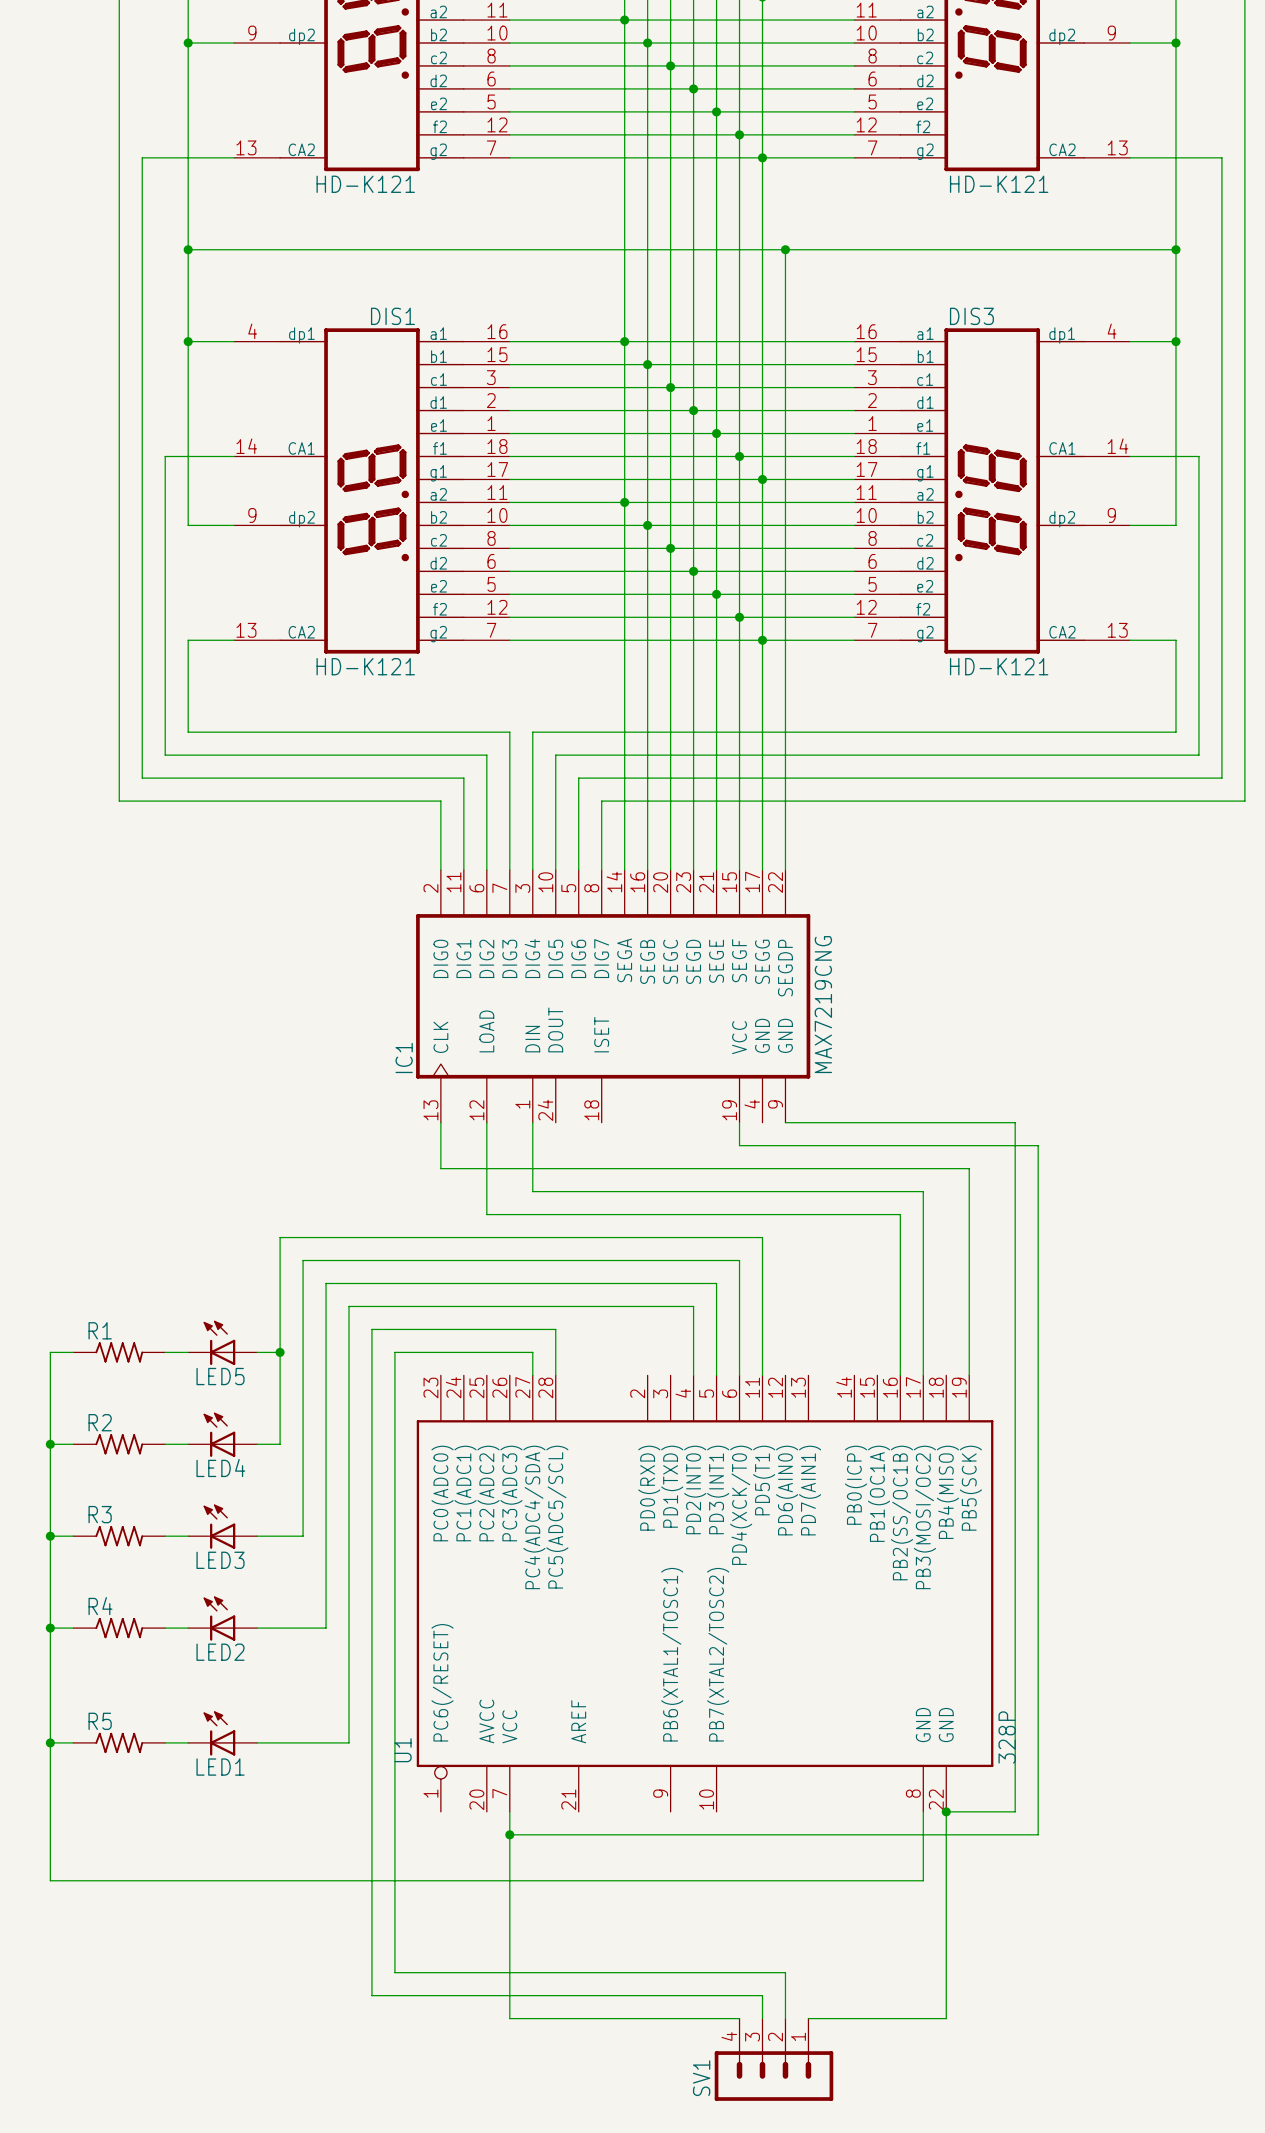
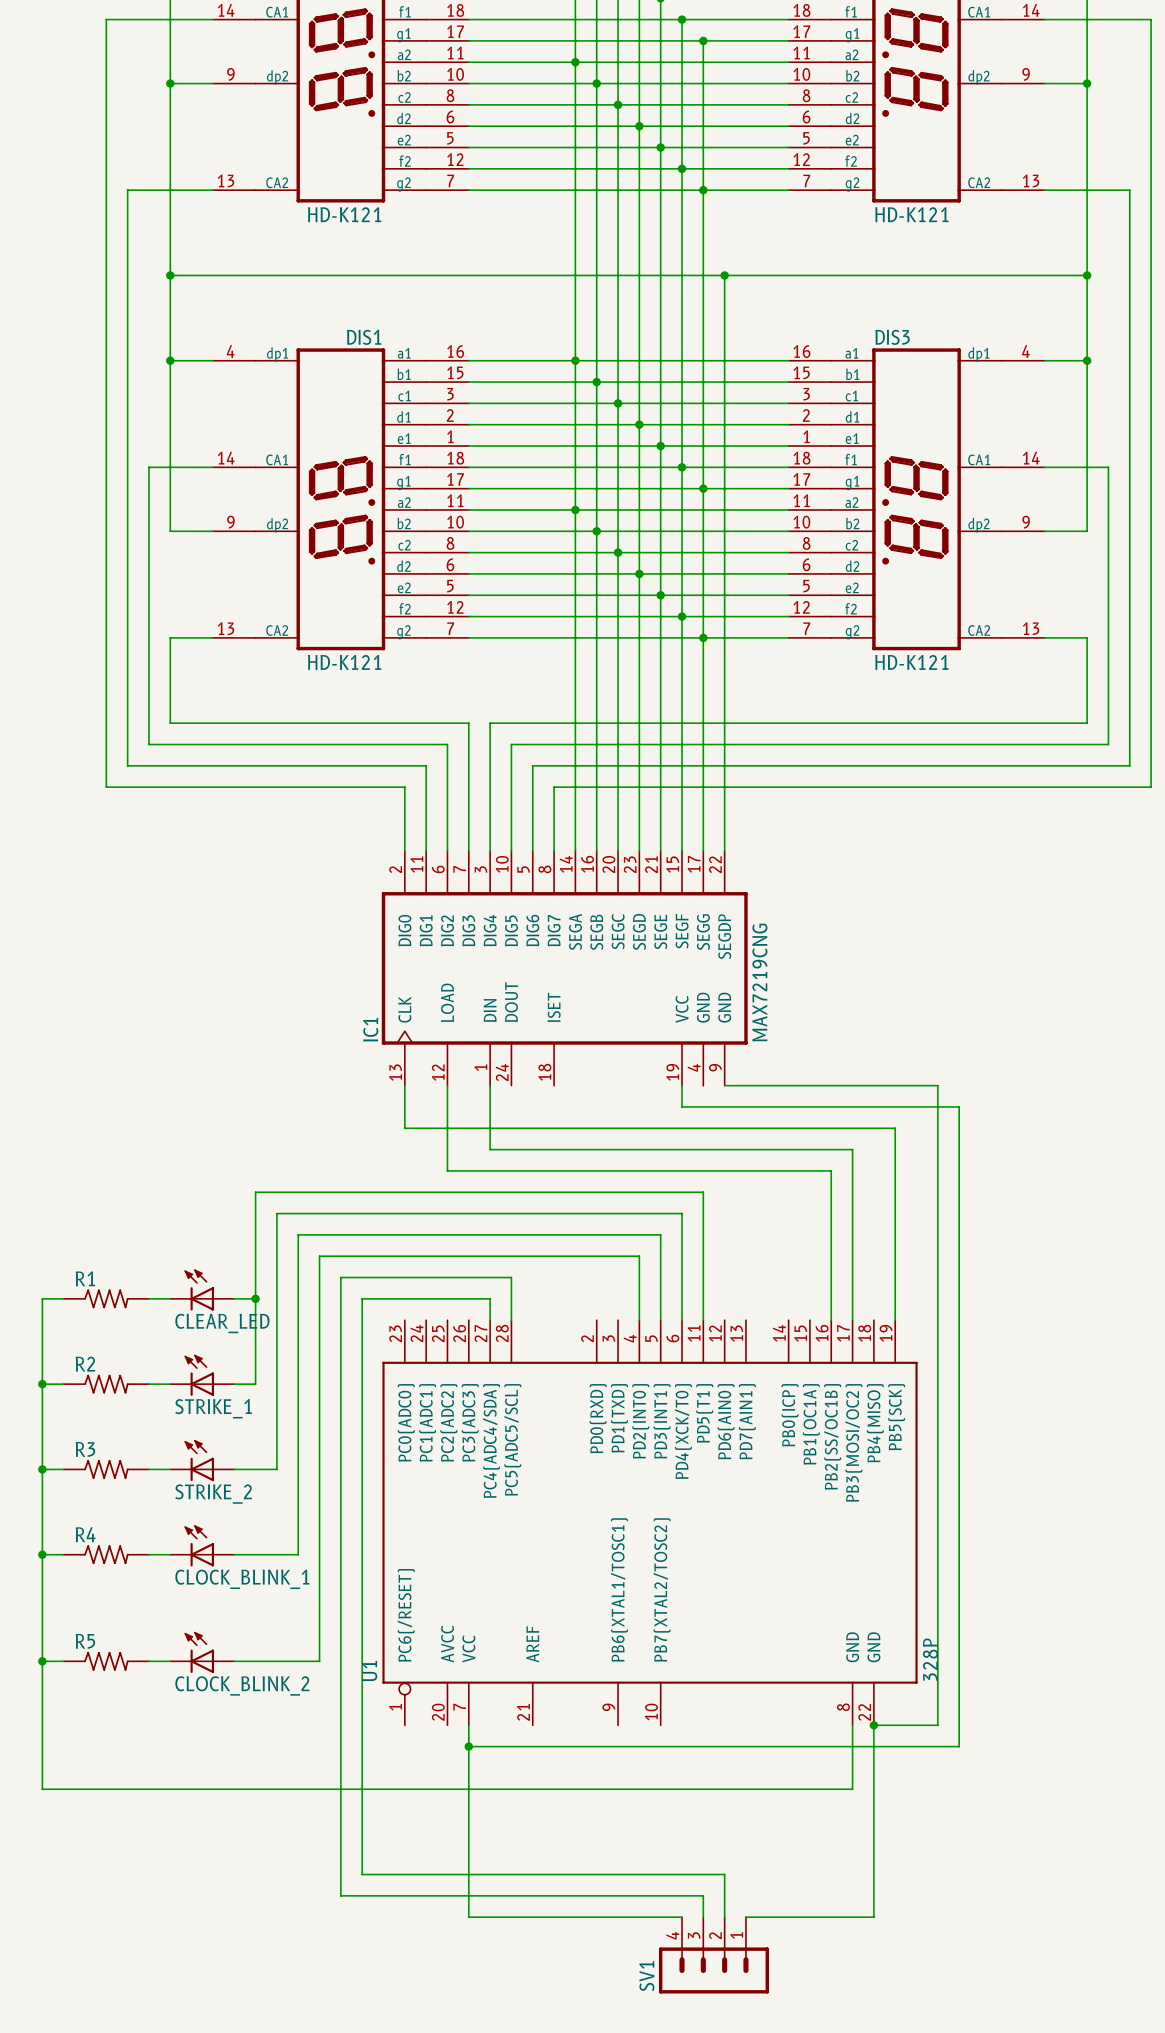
LED5 name: LED5 (220, 1376) -> CLEAR_LED (222, 1323)
LED4 name: LED4 (220, 1468) -> STRIKE_1 (213, 1408)
LED3 name: LED3 (220, 1560) -> STRIKE_2 (213, 1494)
LED2 name: LED2 (220, 1652) -> CLOCK_BLINK_1 (242, 1579)
LED1 name: LED1 (220, 1767) -> CLOCK_BLINK_2 (242, 1685)

